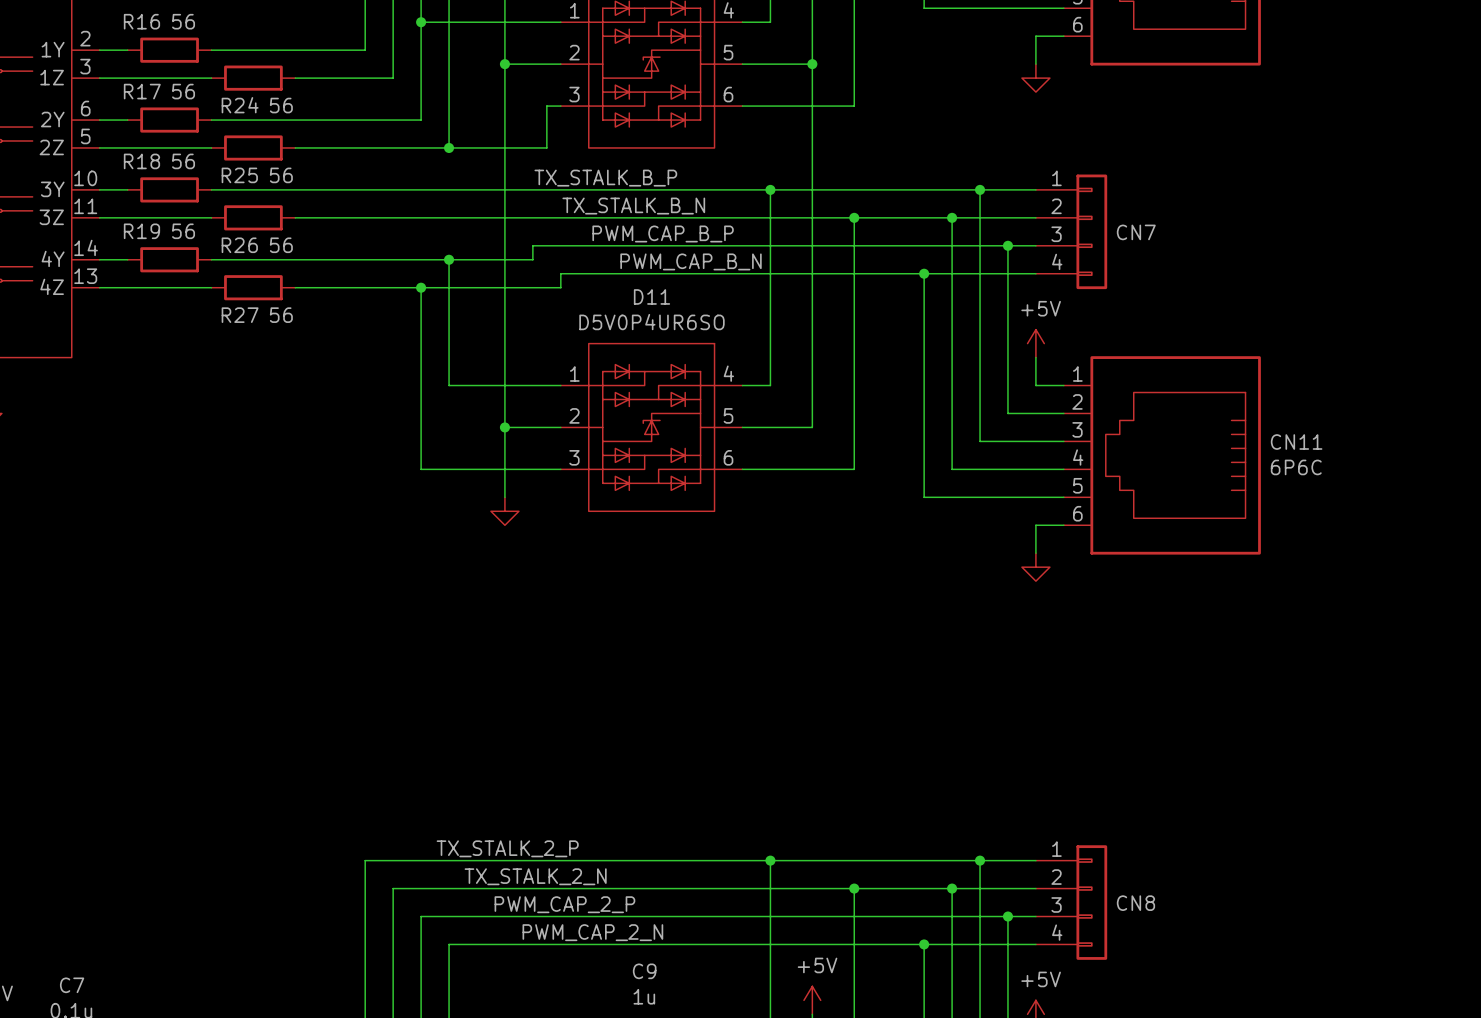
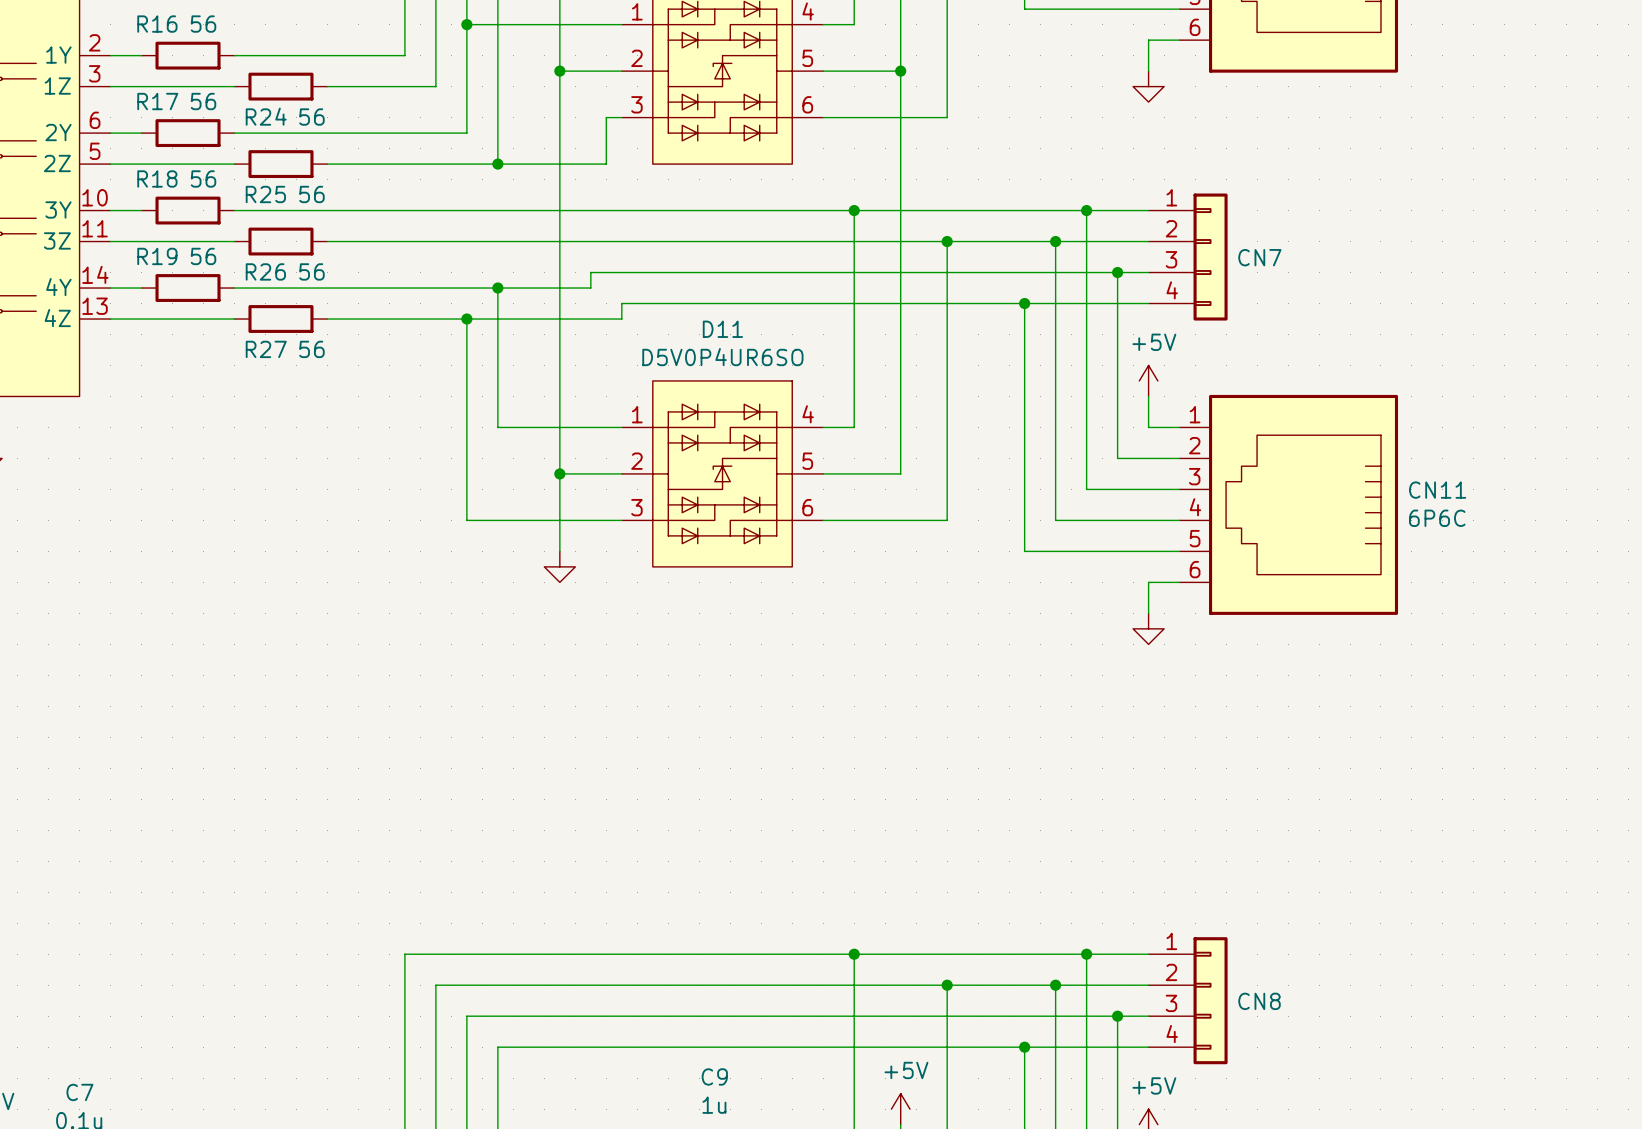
label: TX_STALK_B_P (605, 178) -> none
label: TX_STALK_B_N (633, 206) -> none
label: PWM_CAP_B_P (663, 233) -> none
label: PWM_CAP_B_N (691, 261) -> none
label: TX_STALK_2_P (507, 848) -> none
label: TX_STALK_2_N (535, 876) -> none
label: PWM_CAP_2_P (564, 904) -> none
label: PWM_CAP_2_N (592, 932) -> none

